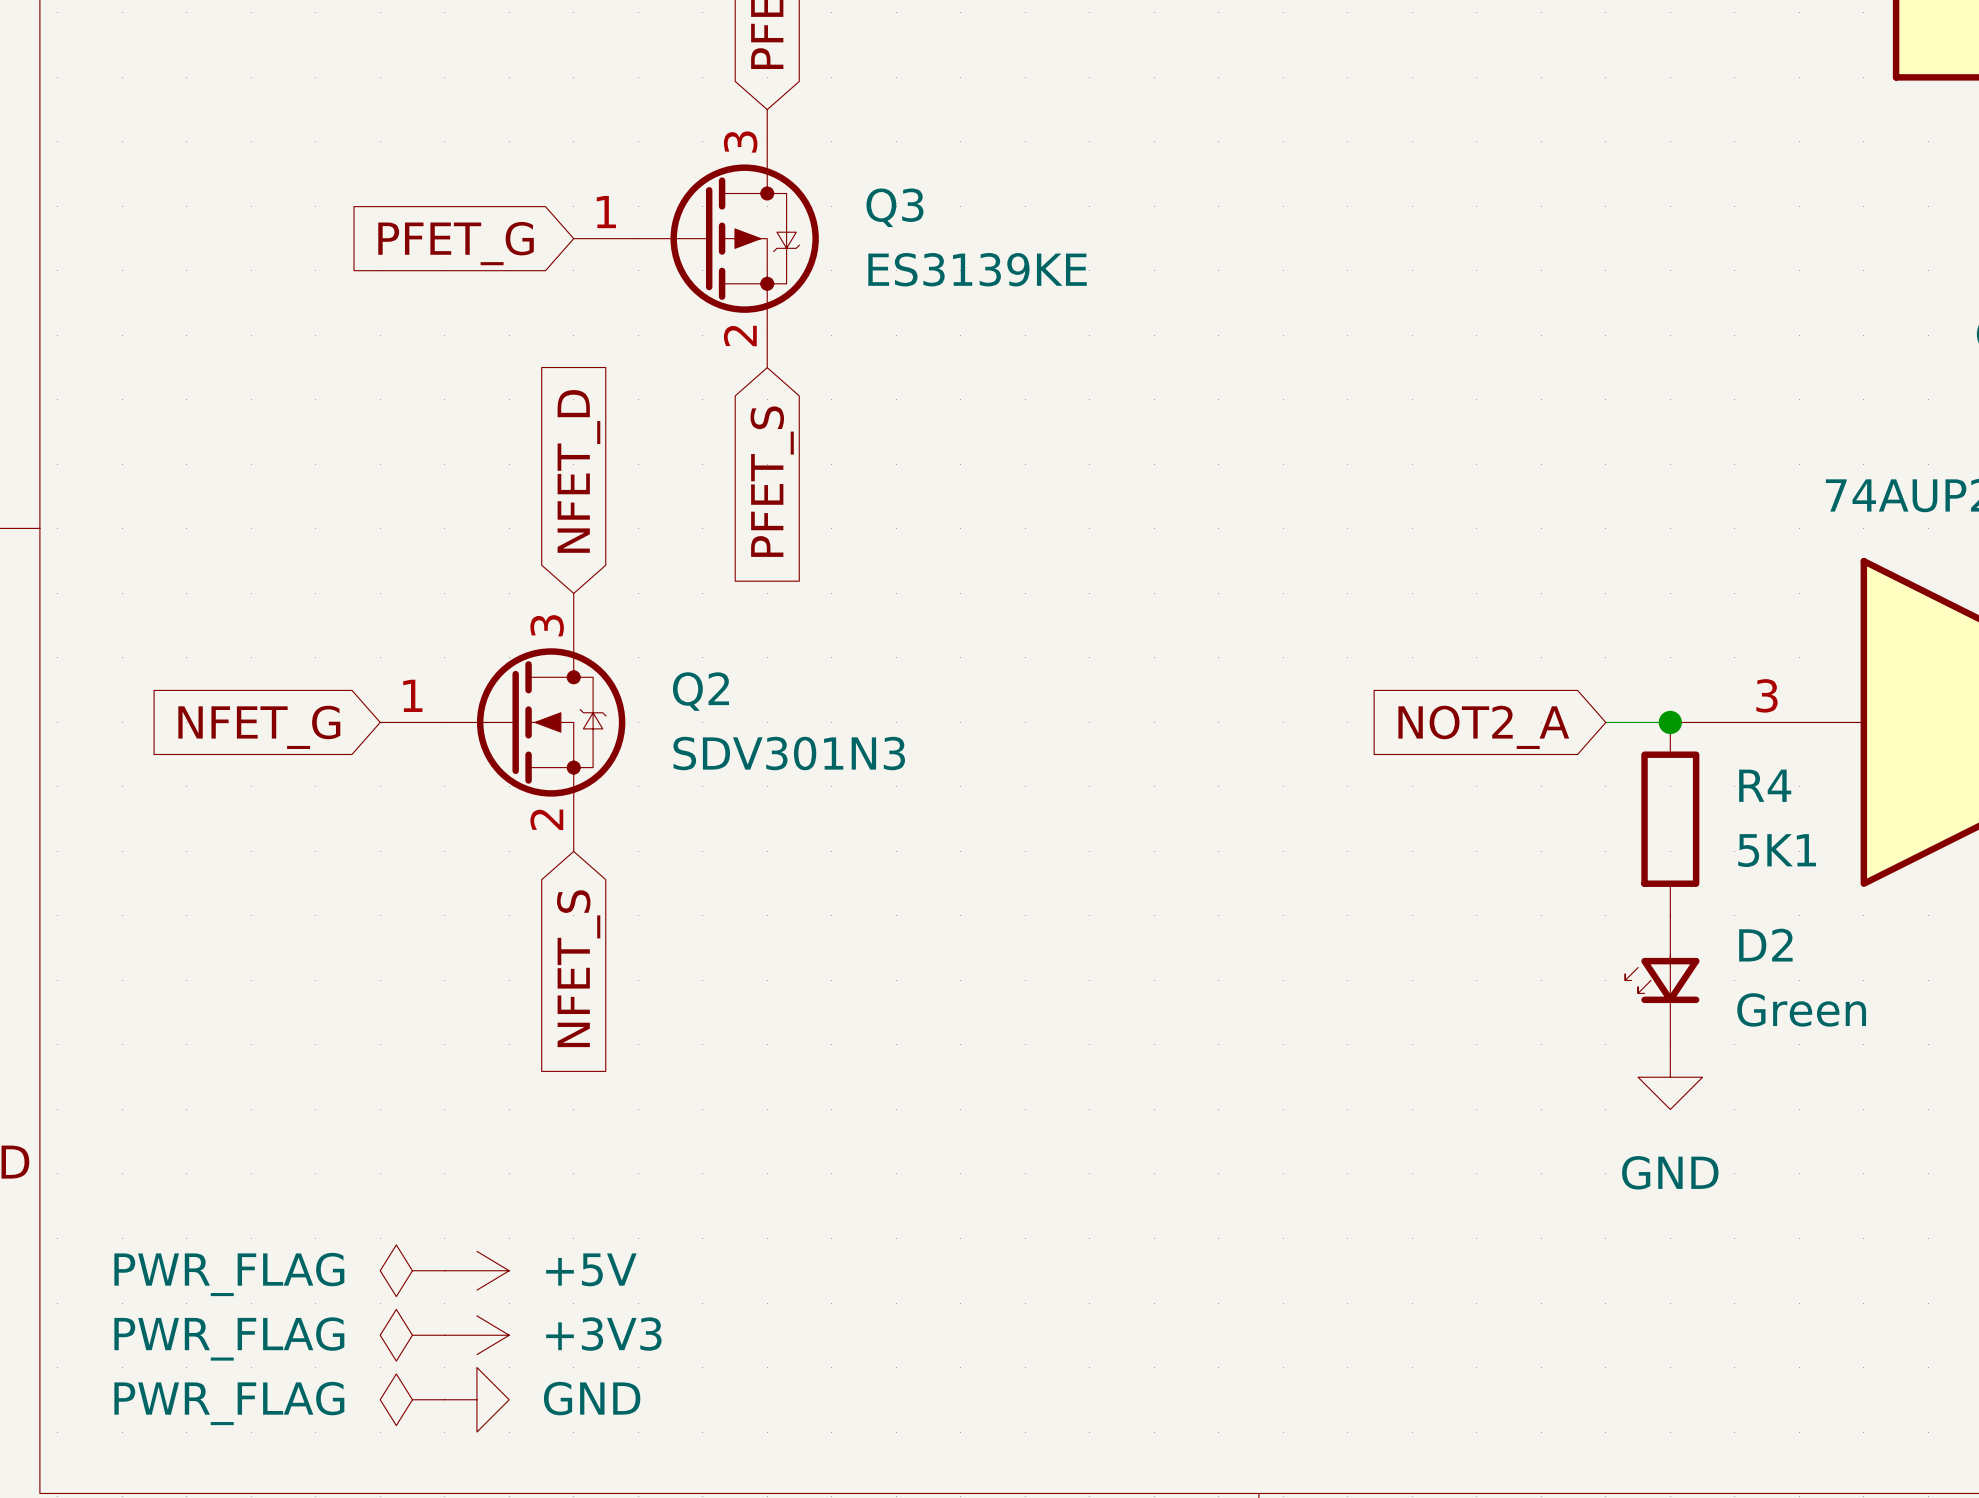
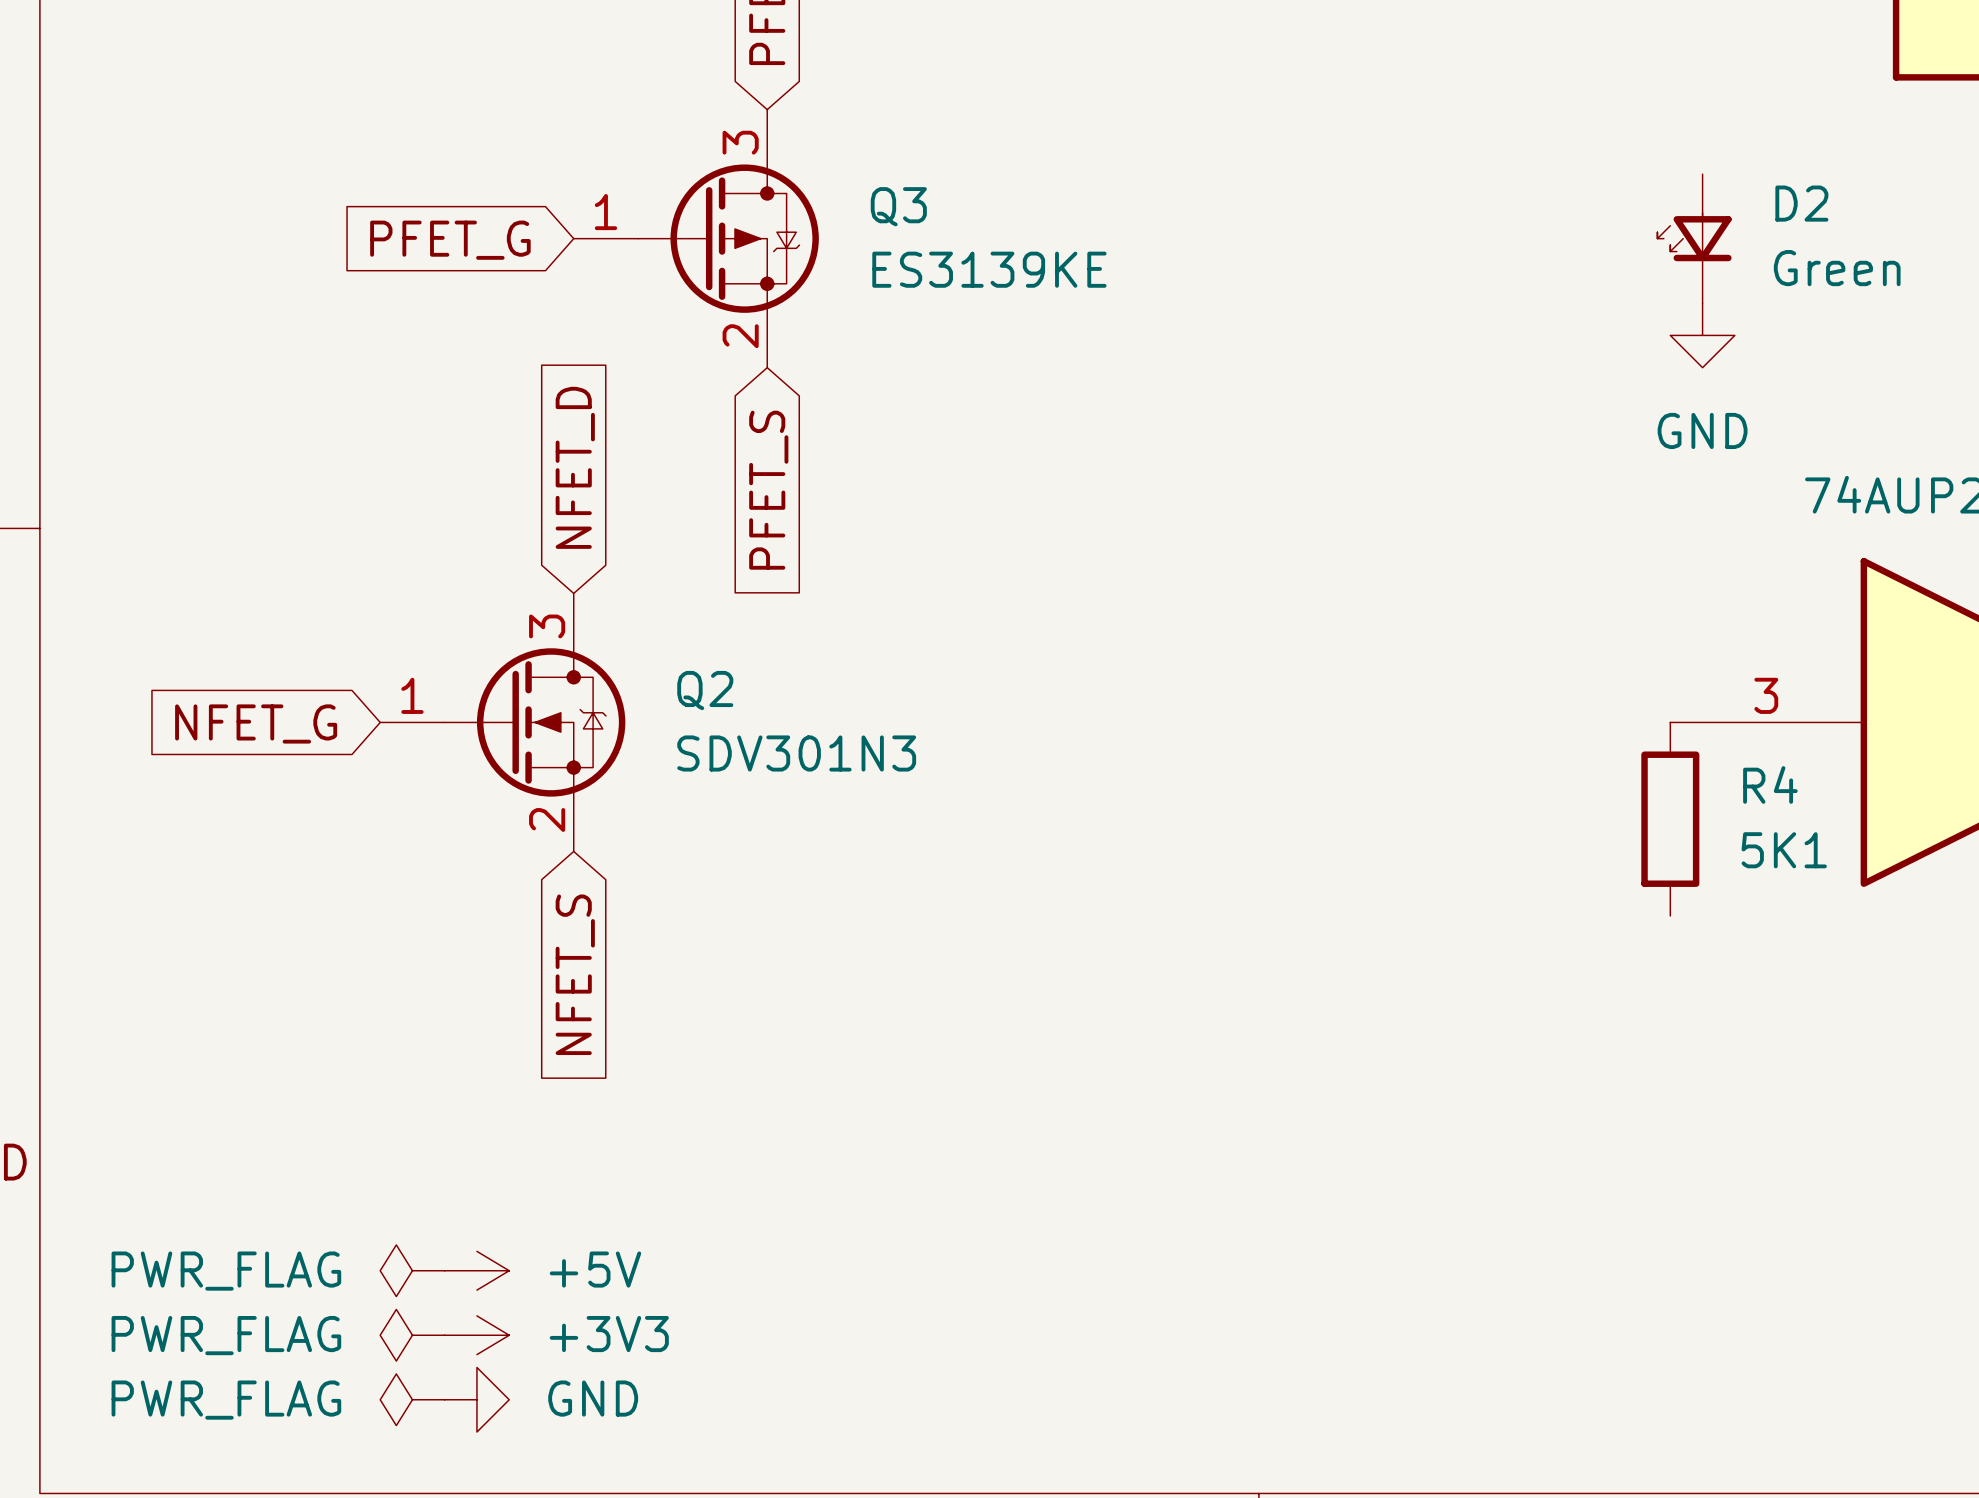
power symbol: none -> GND (1702, 335)
wire: (1605, 722) (1670, 722) -> none
junction: (1670, 722) -> none
global label: NOT2_A (1483, 727) -> none
D2 position: (1662, 980) -> (1694, 238)
power symbol: GND (1670, 1077) -> none

